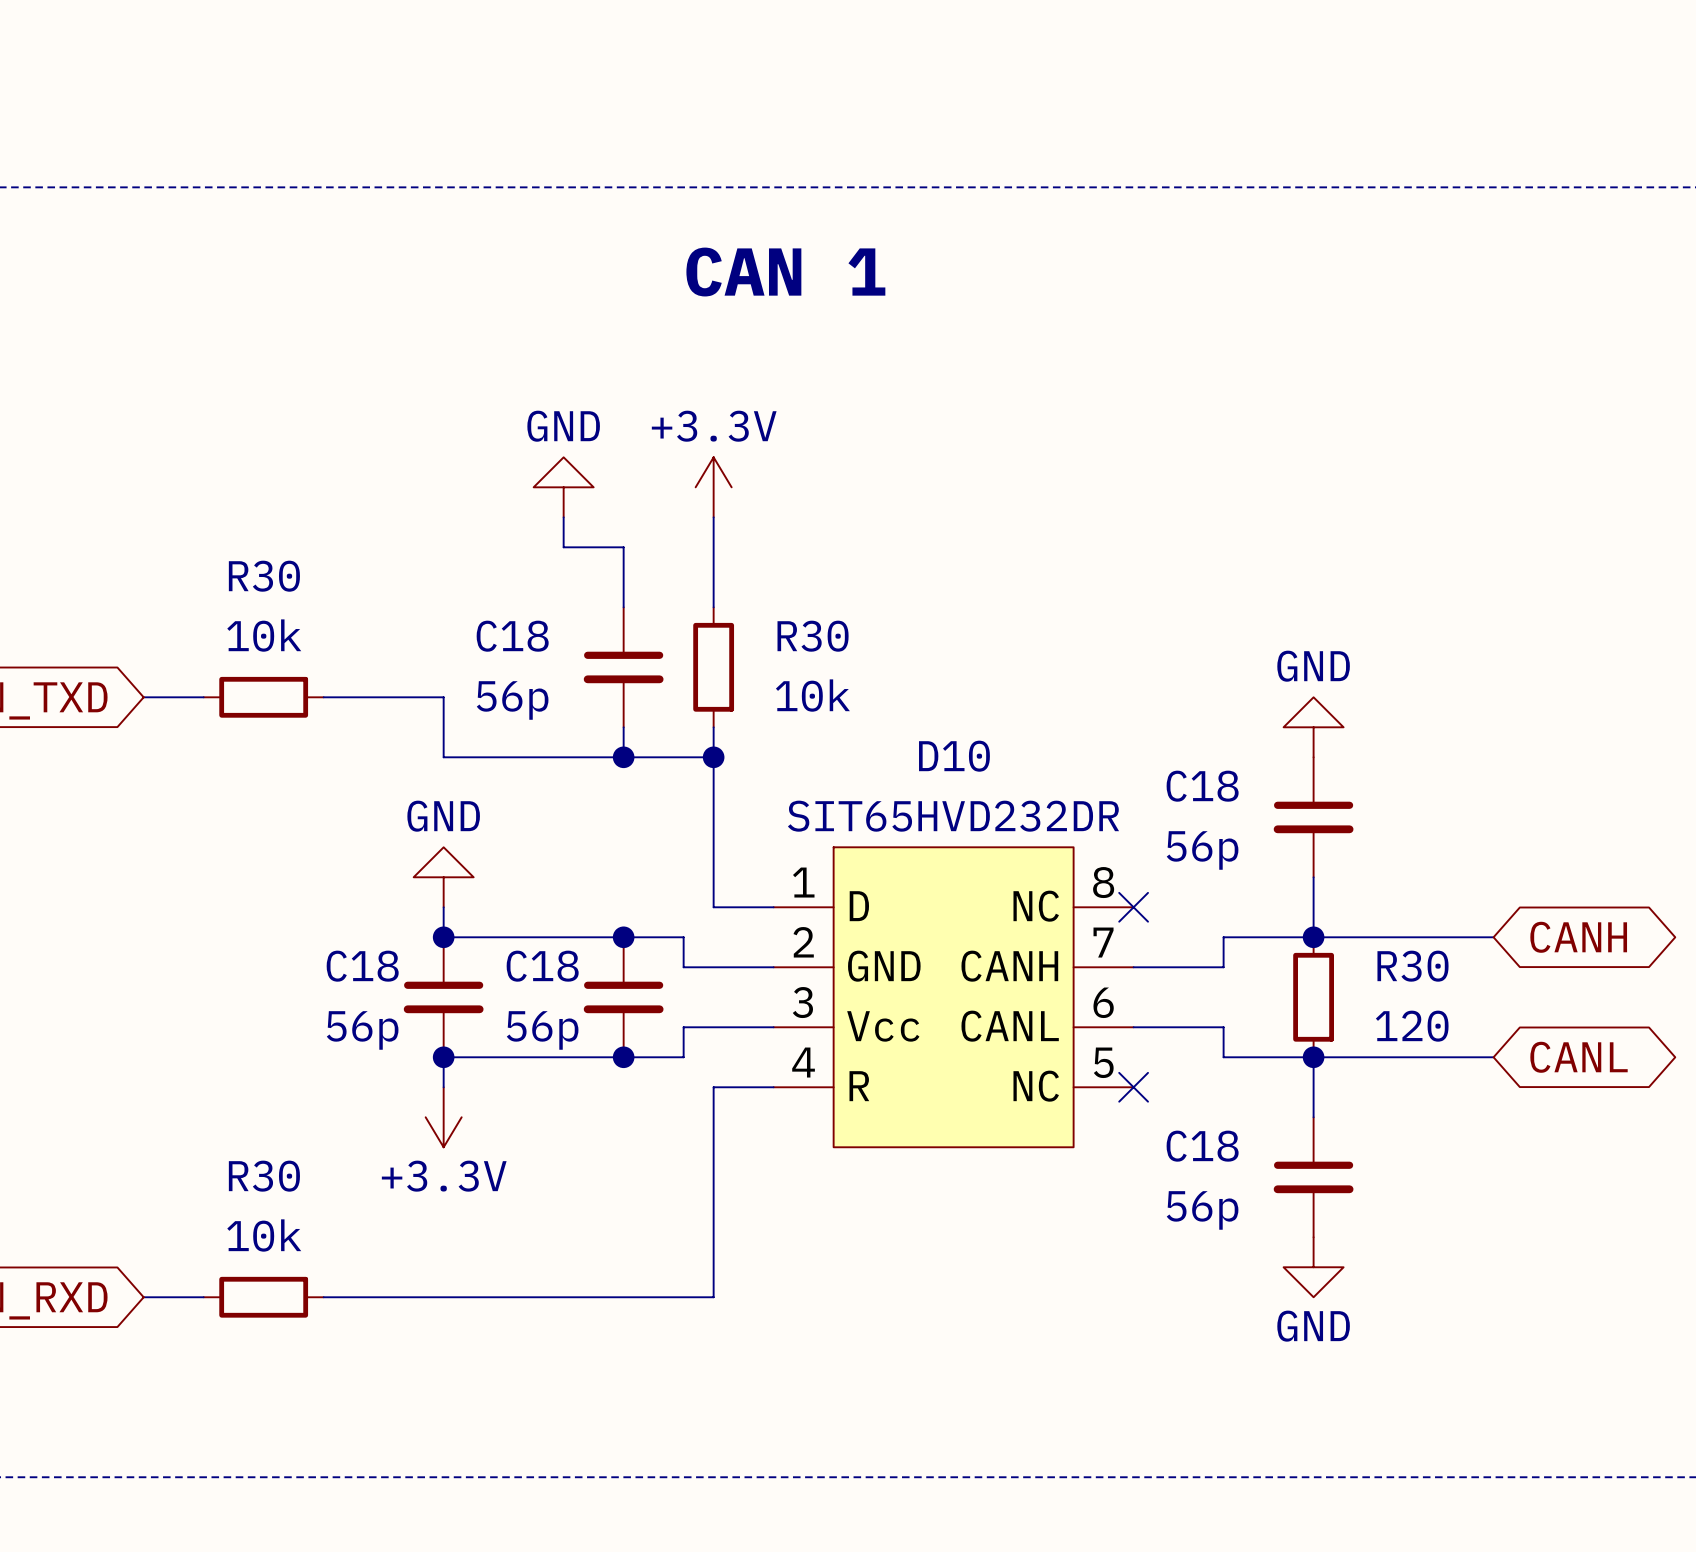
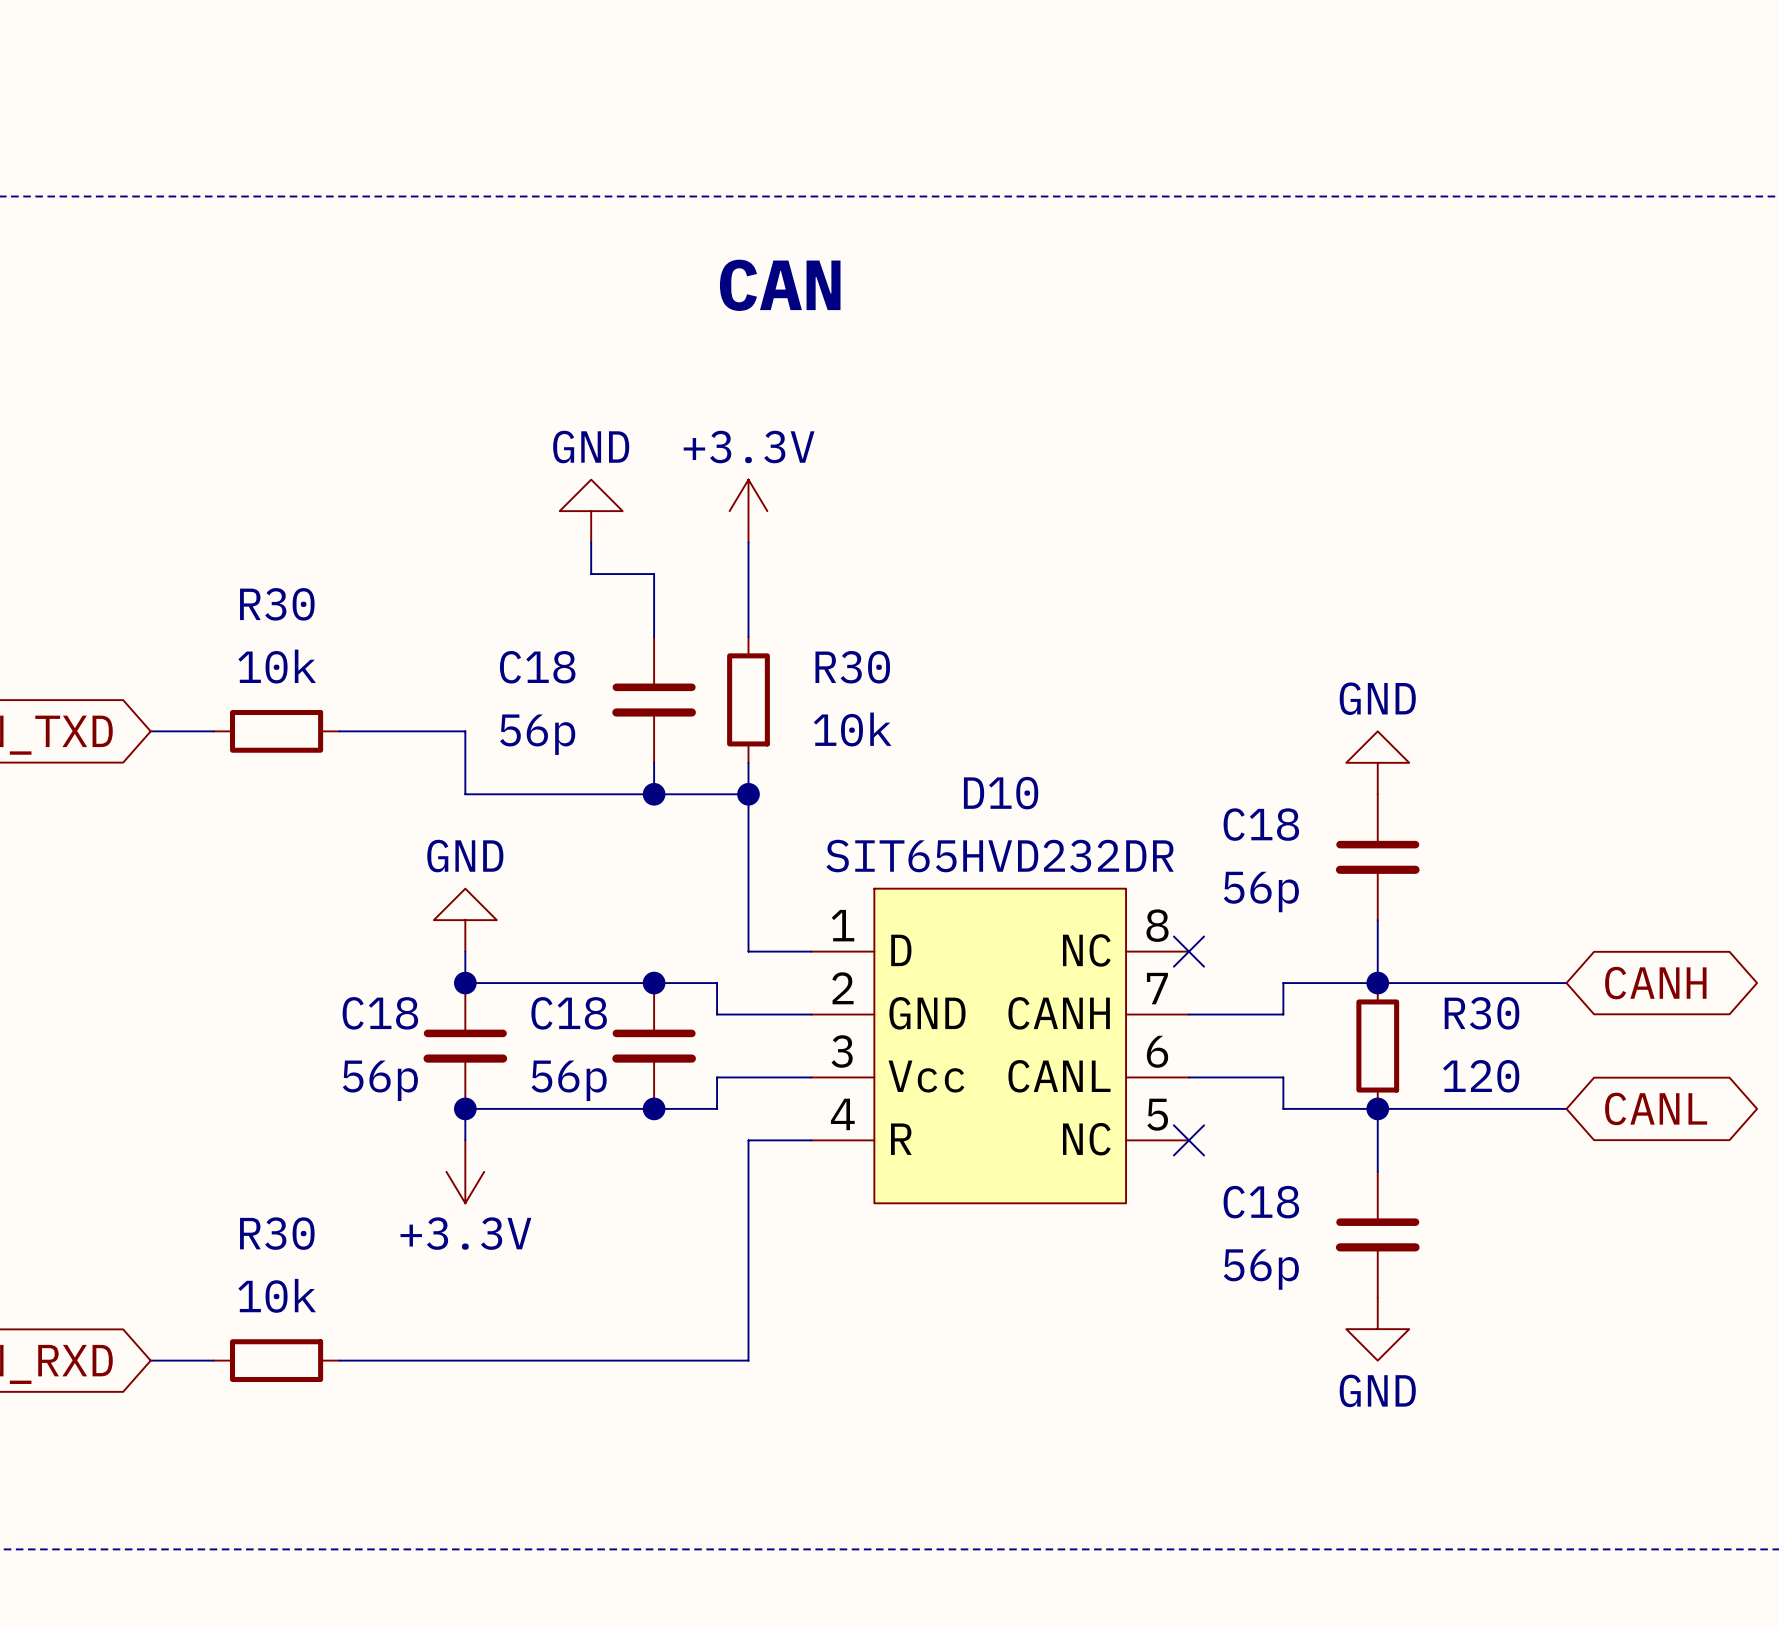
text: CAN 1 (785, 272) -> CAN (780, 285)

